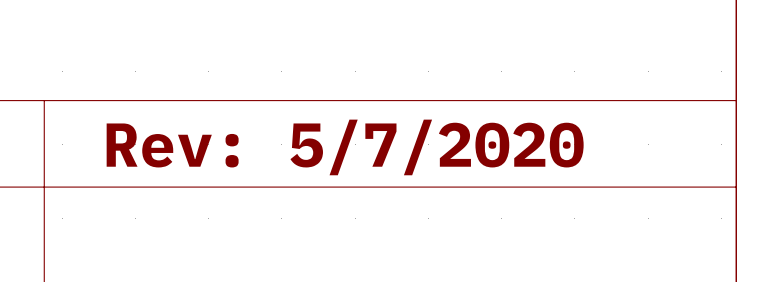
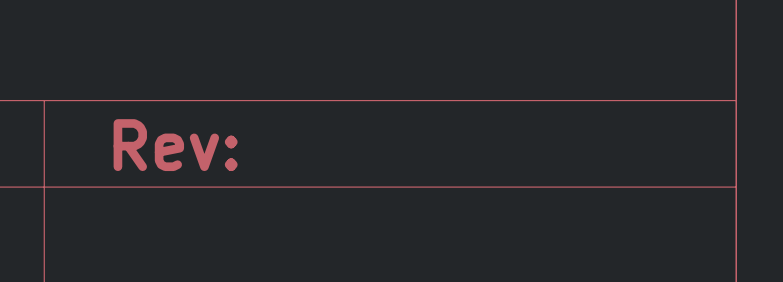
title block: Rev: 5/7/2020 (345, 147) -> Rev: (175, 145)

